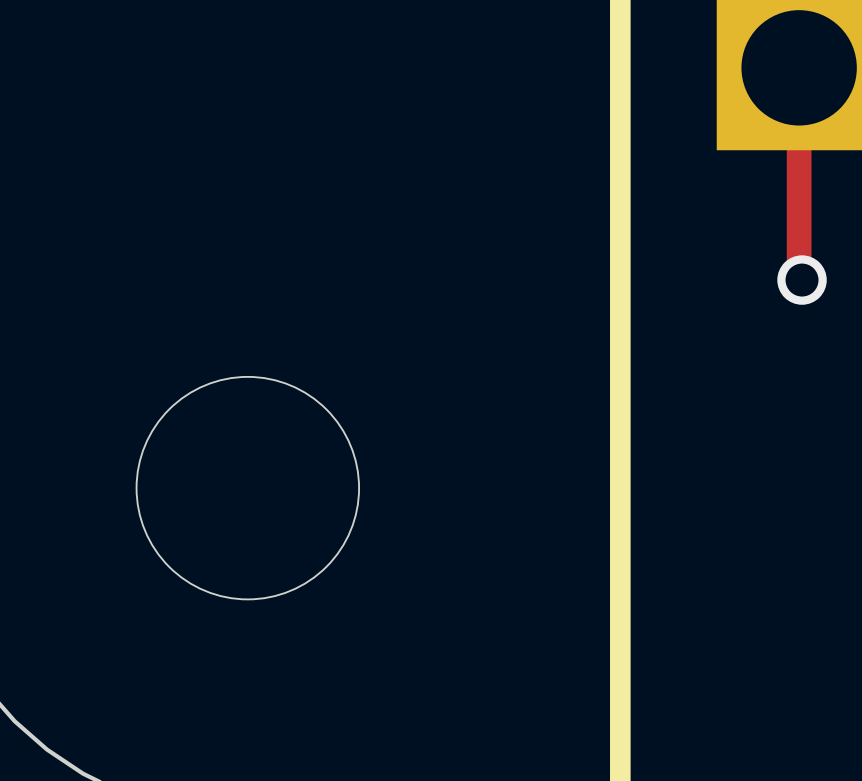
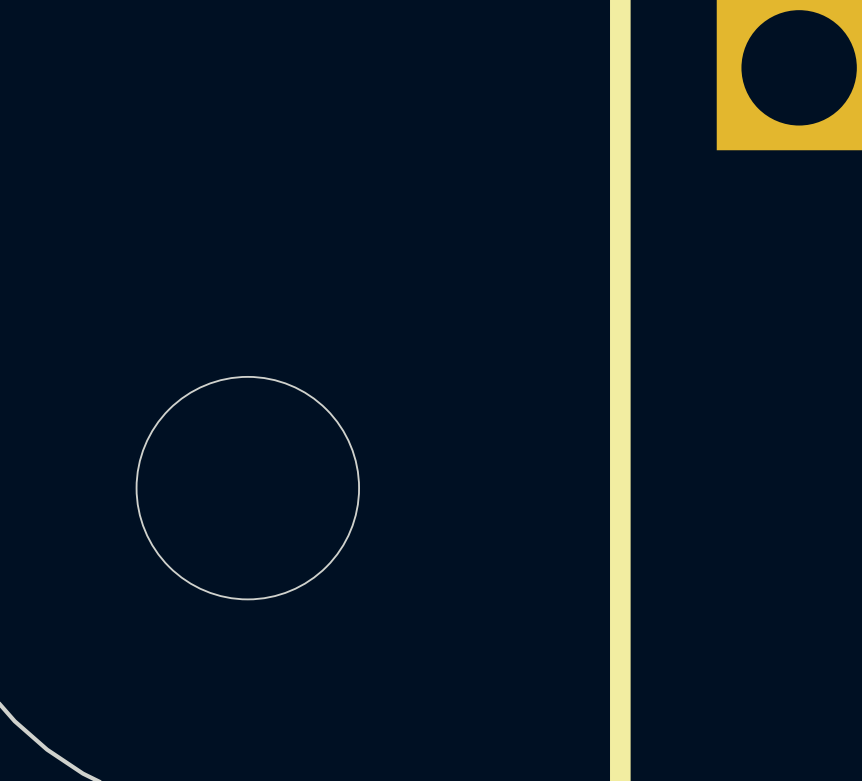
top track: (799, 67) (799, 277) (802, 280) -> none
via: (802, 280) -> none

